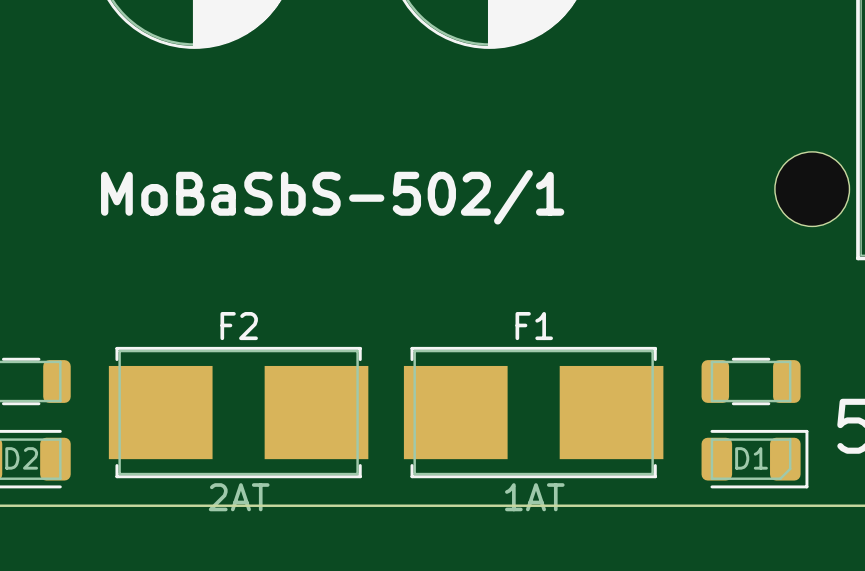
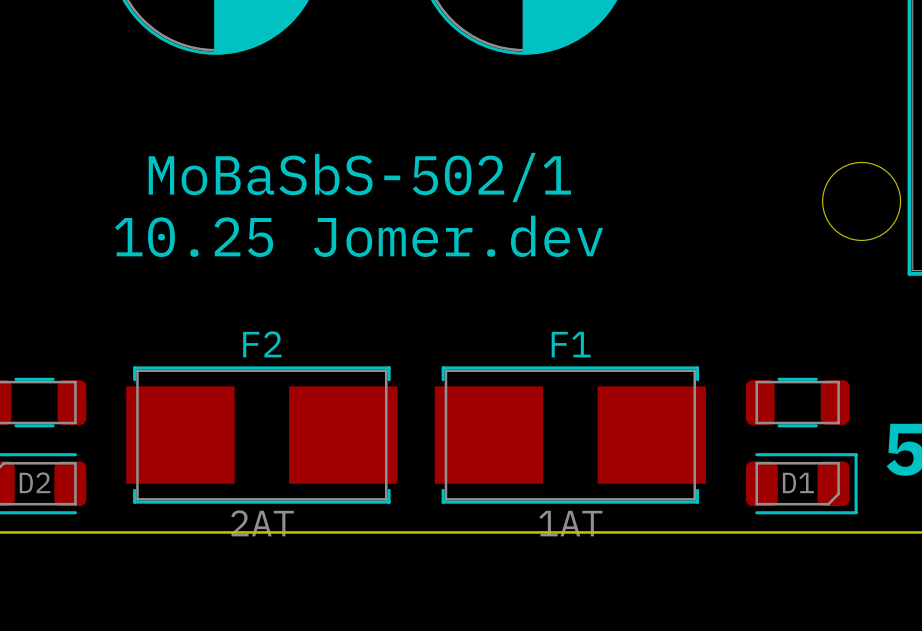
text position: MoBaSbS-502/1 (332, 197) -> MoBaSbS-502/1 (359, 177)
text: none -> 10.25 Jomer.dev (358, 236)

